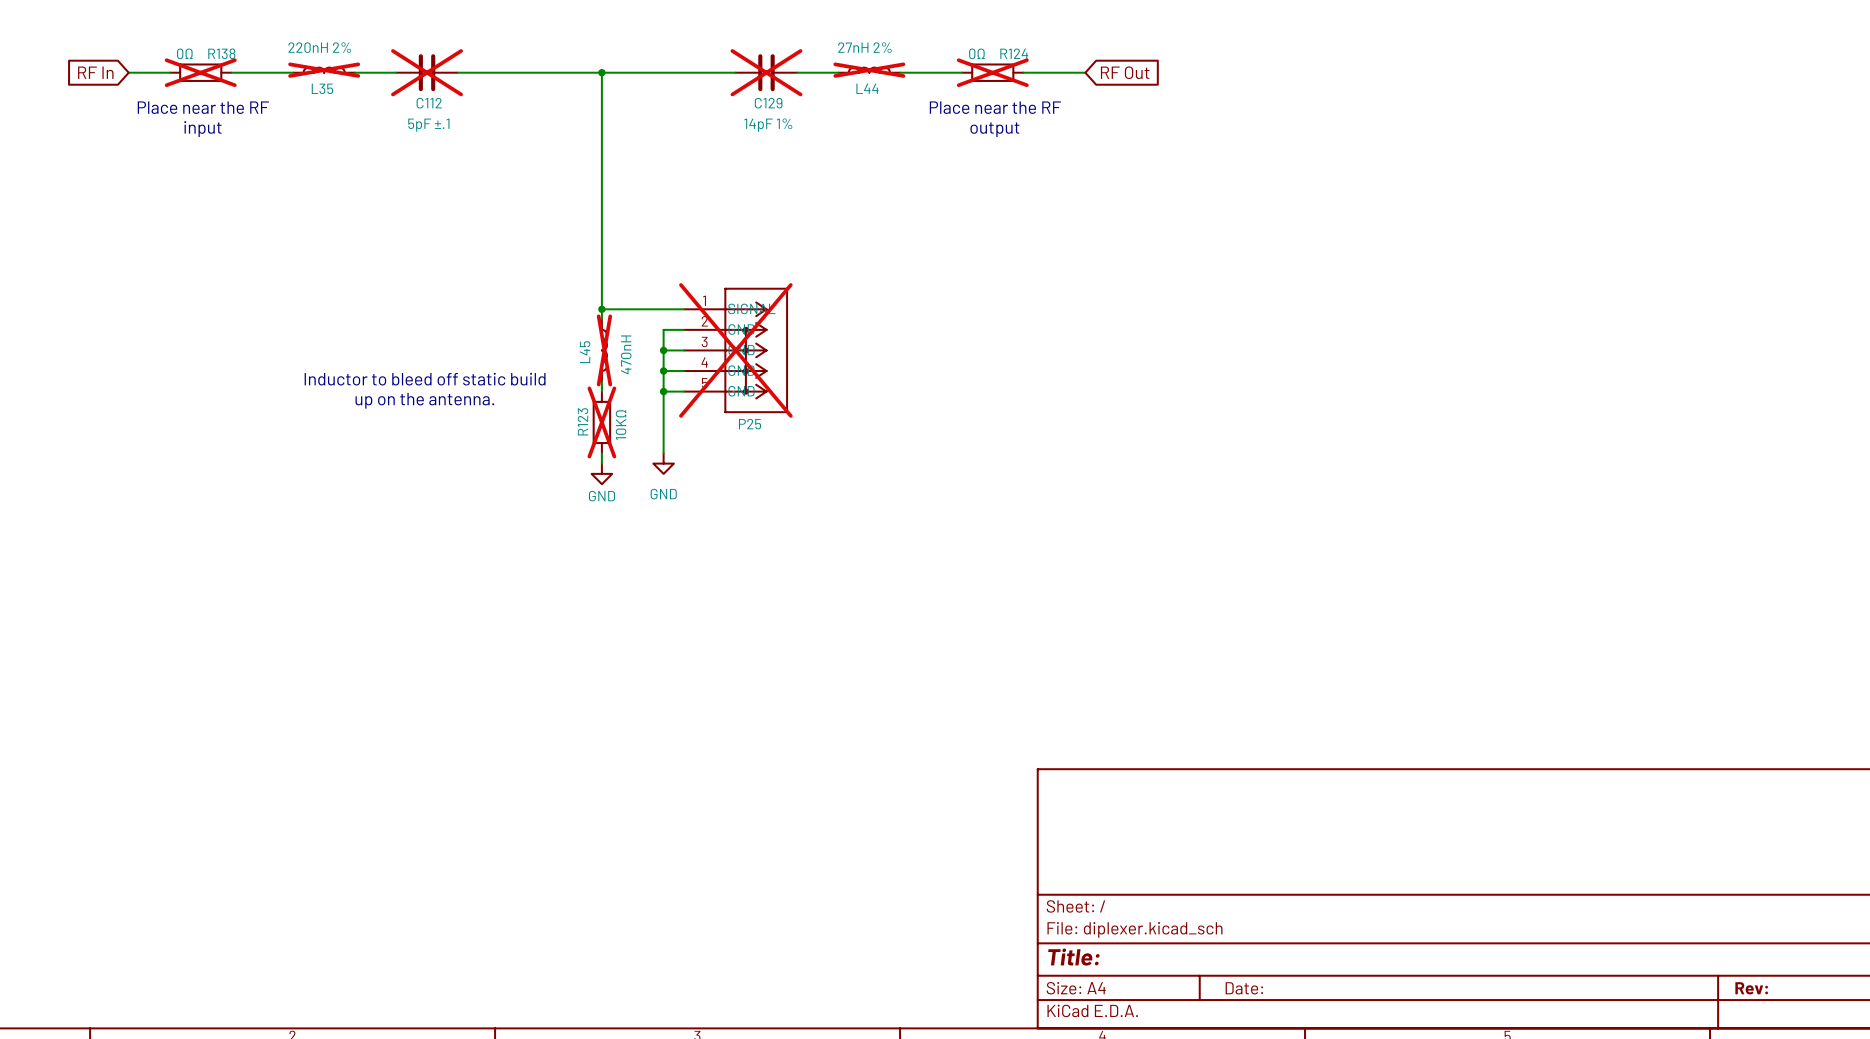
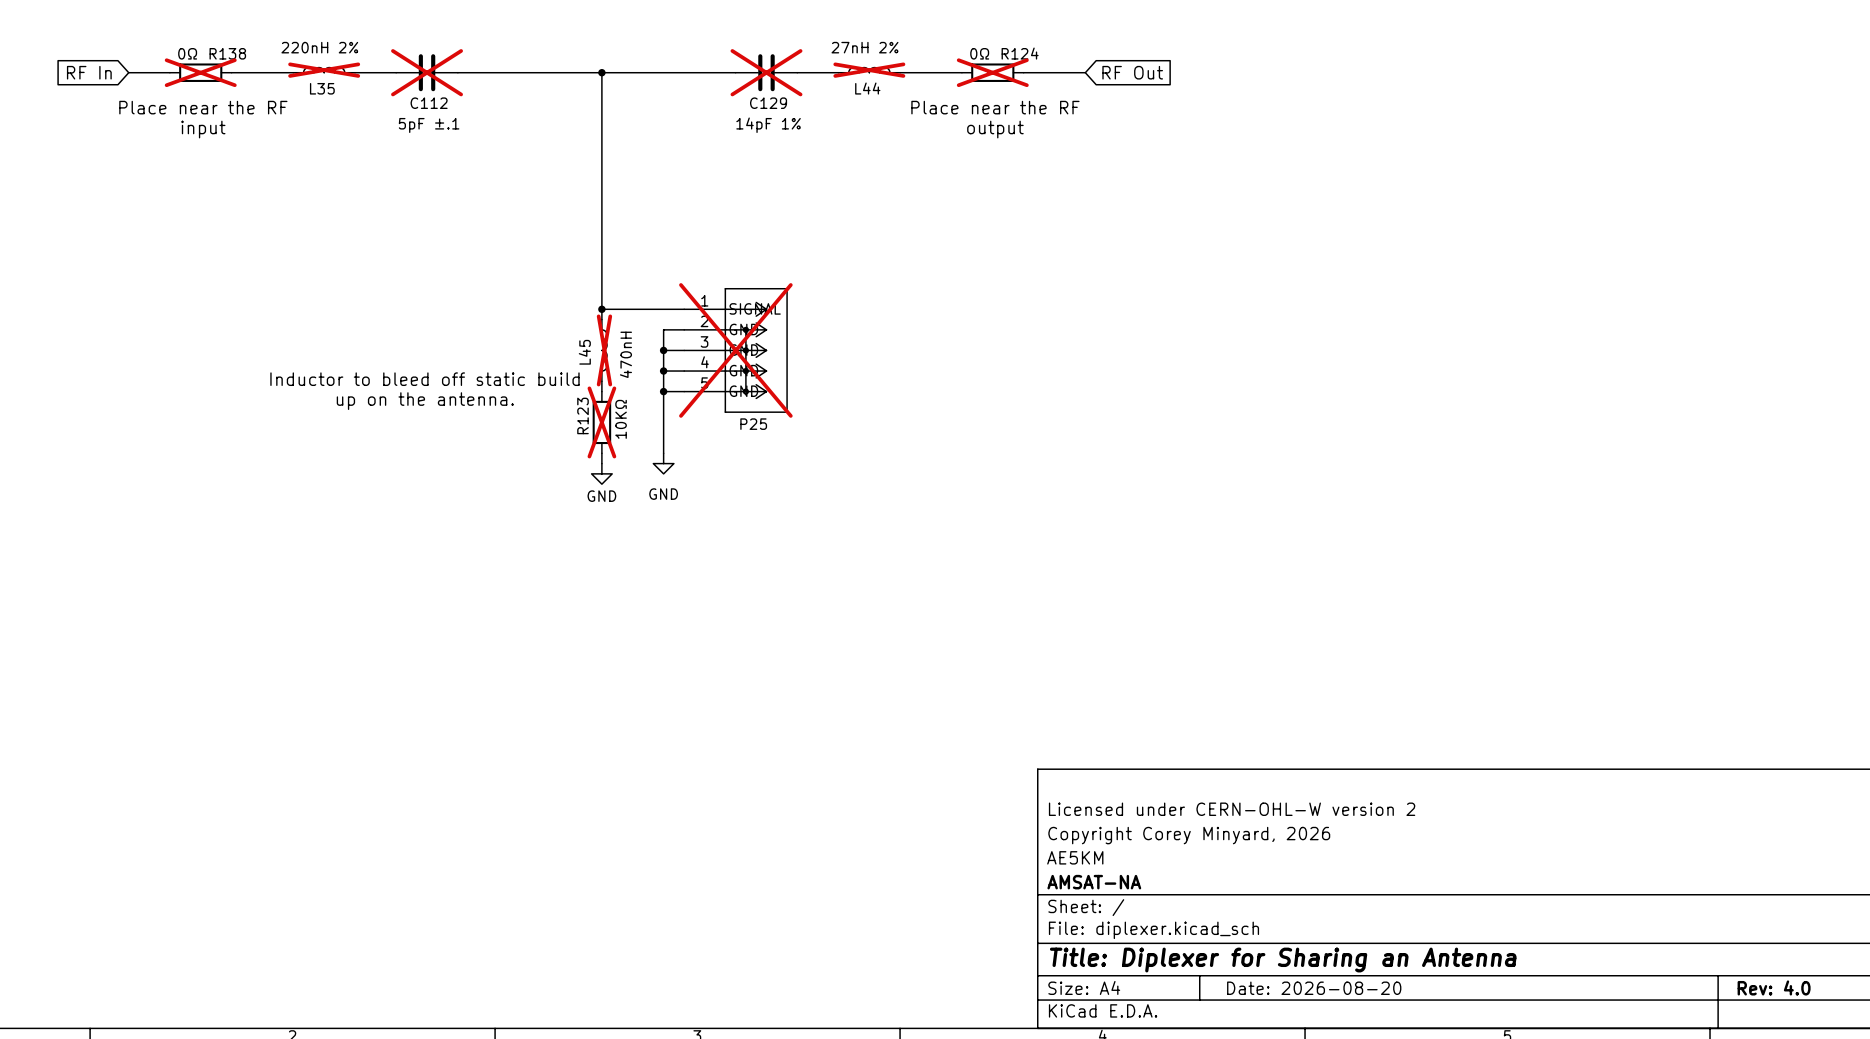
title block: none -> Licensed under CERN-OHL-W version 2 (1232, 809)
title block: none -> Copyright Corey Minyard, 2026 (1189, 835)
title block: none -> AE5KM (1075, 857)
title block: none -> AMSAT-NA (1094, 882)
title block: Title: (1073, 957) -> Title: Diplexer for Sharing an Antenna (1283, 960)
title block: Date: (1244, 988) -> Date: 2026-08-20 (1314, 988)
title block: Rev: (1751, 988) -> Rev: 4.0 (1774, 987)

